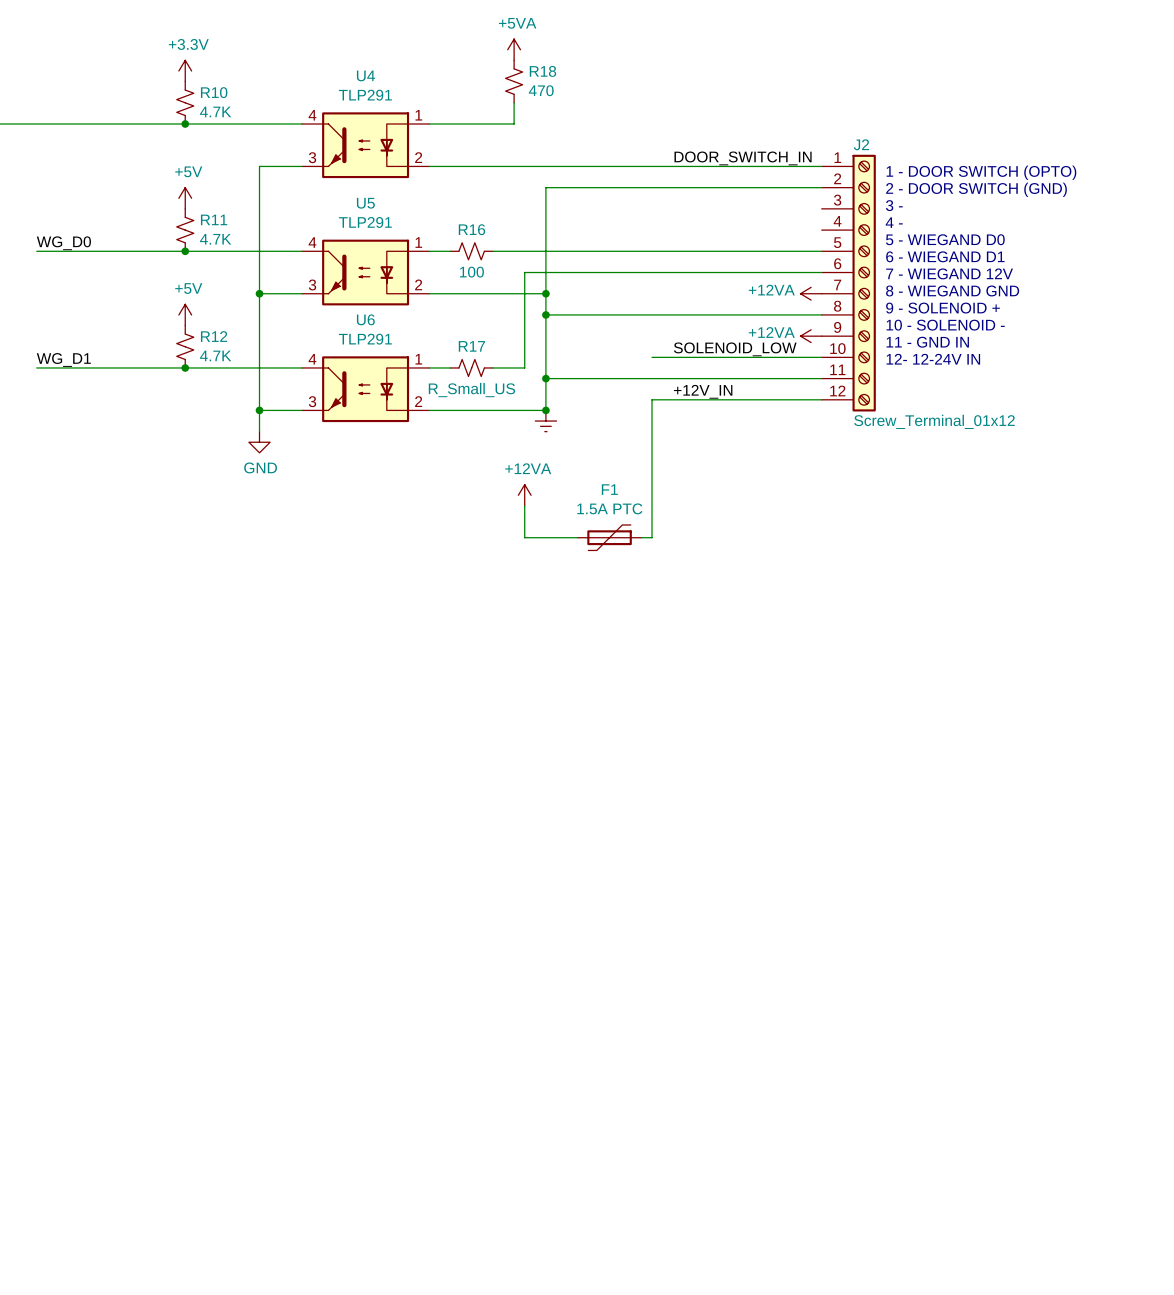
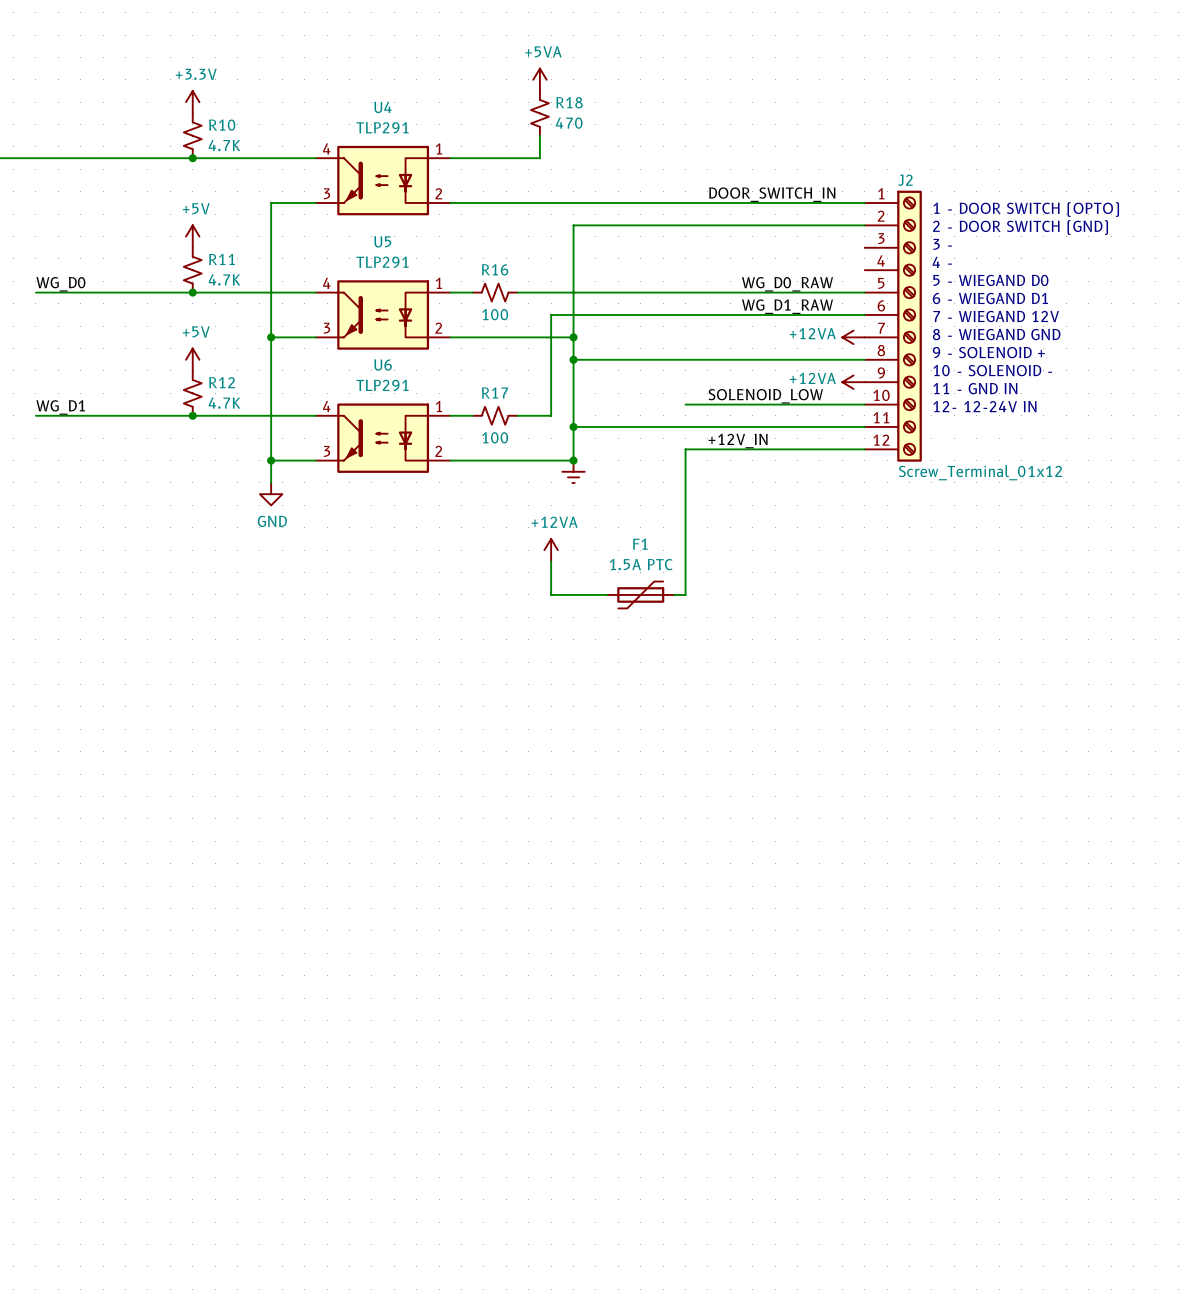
label: none -> WG_D0_RAW (787, 284)
label: none -> WG_D1_RAW (787, 306)
R17 value: R_Small_US (471, 390) -> 100 (495, 437)

